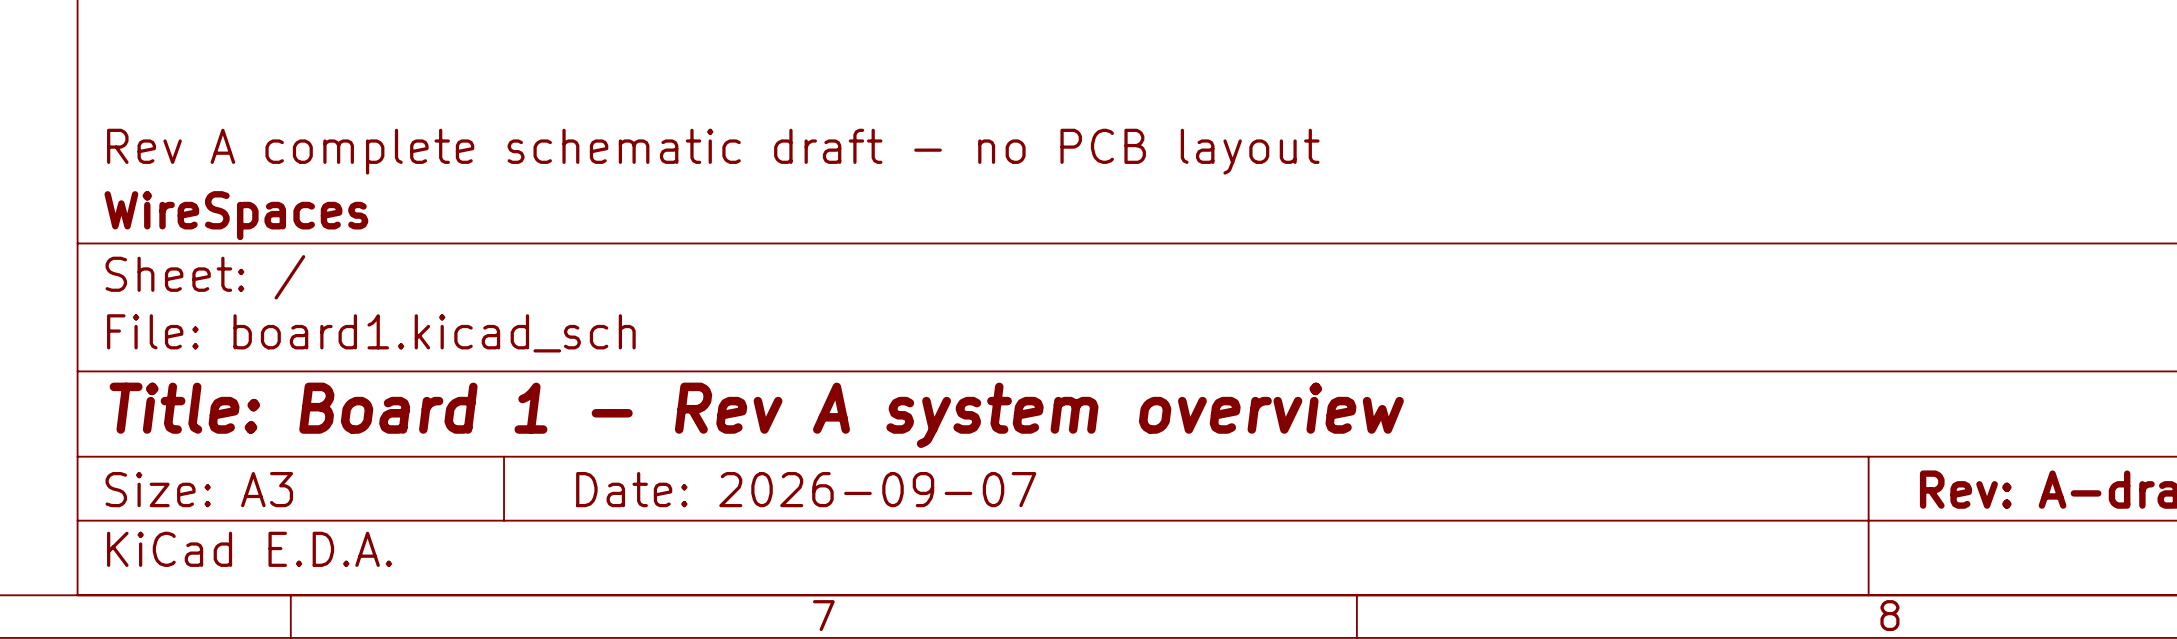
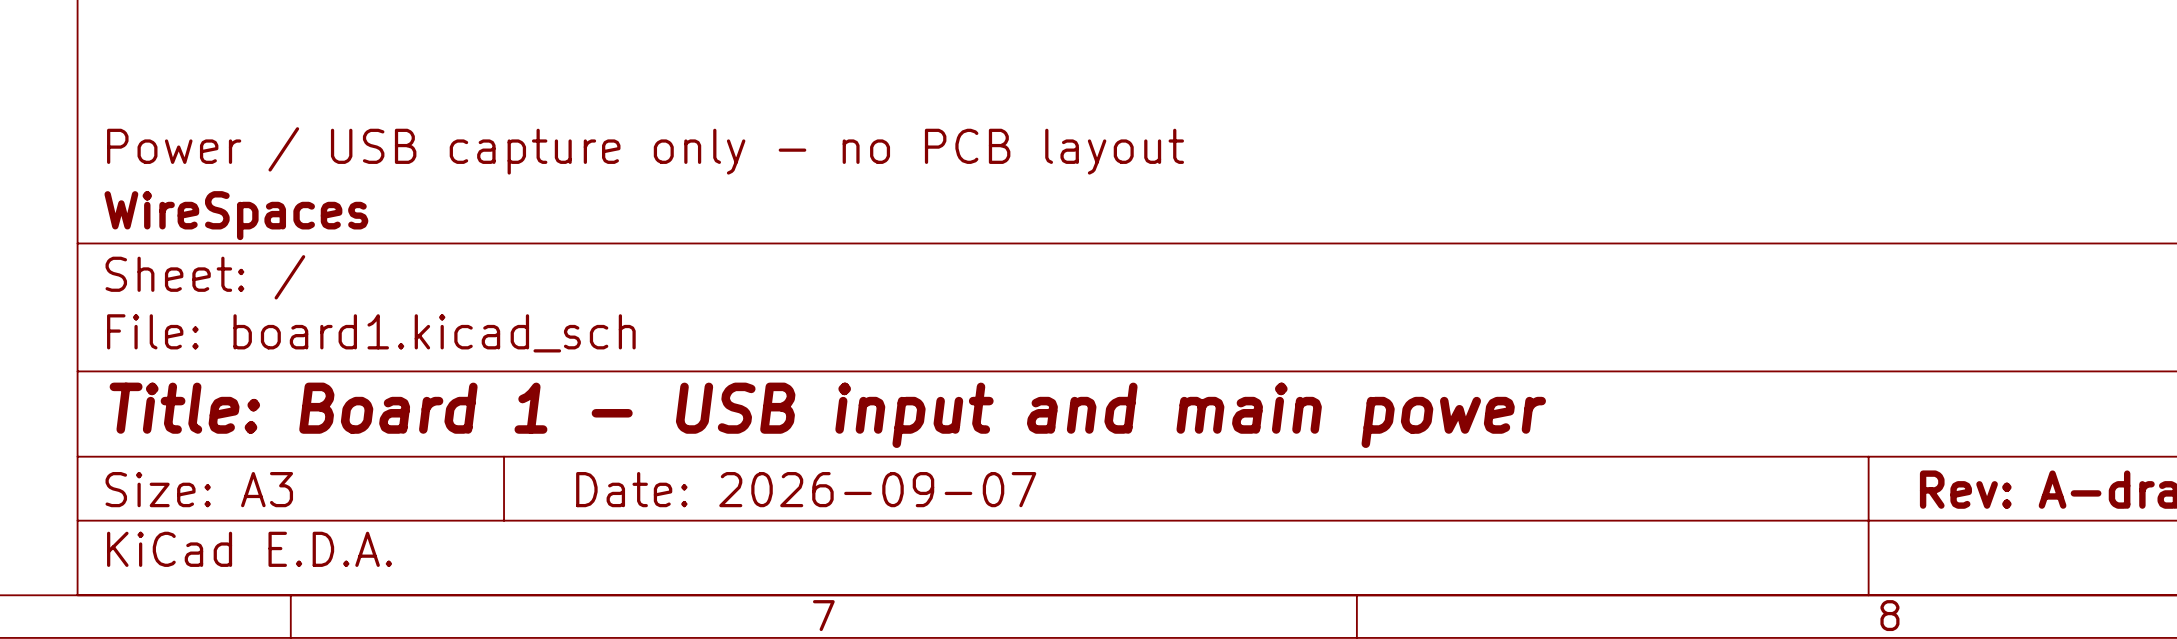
title block: Rev A complete schematic draft - no PCB layout (713, 151) -> Power / USB capture only - no PCB layout (645, 150)
title block: Title: Board 1 - Rev A system overview (756, 415) -> Title: Board 1 - USB input and main power (827, 415)

